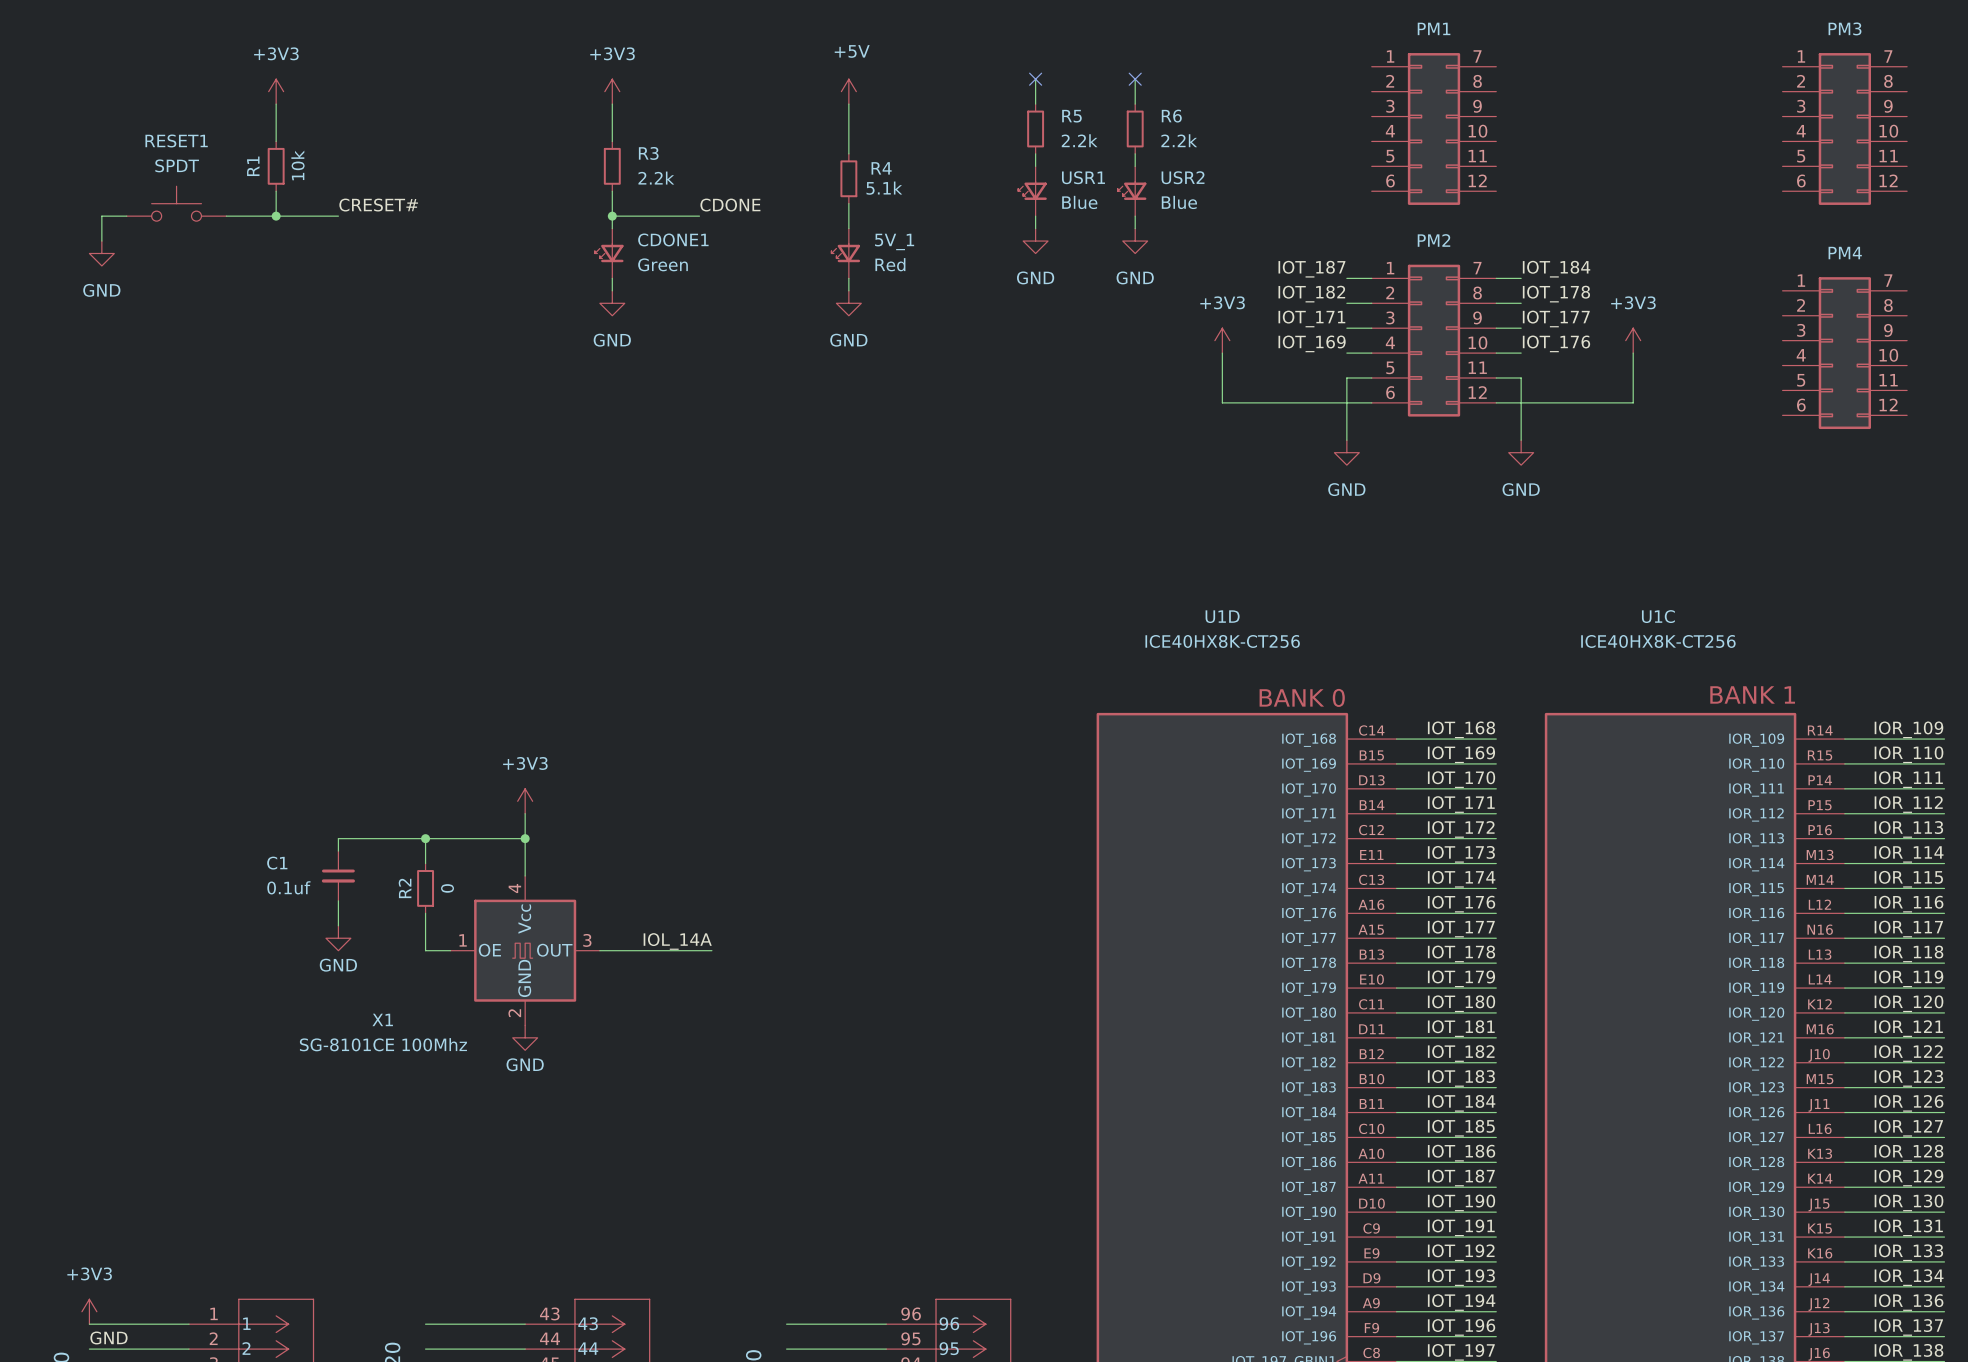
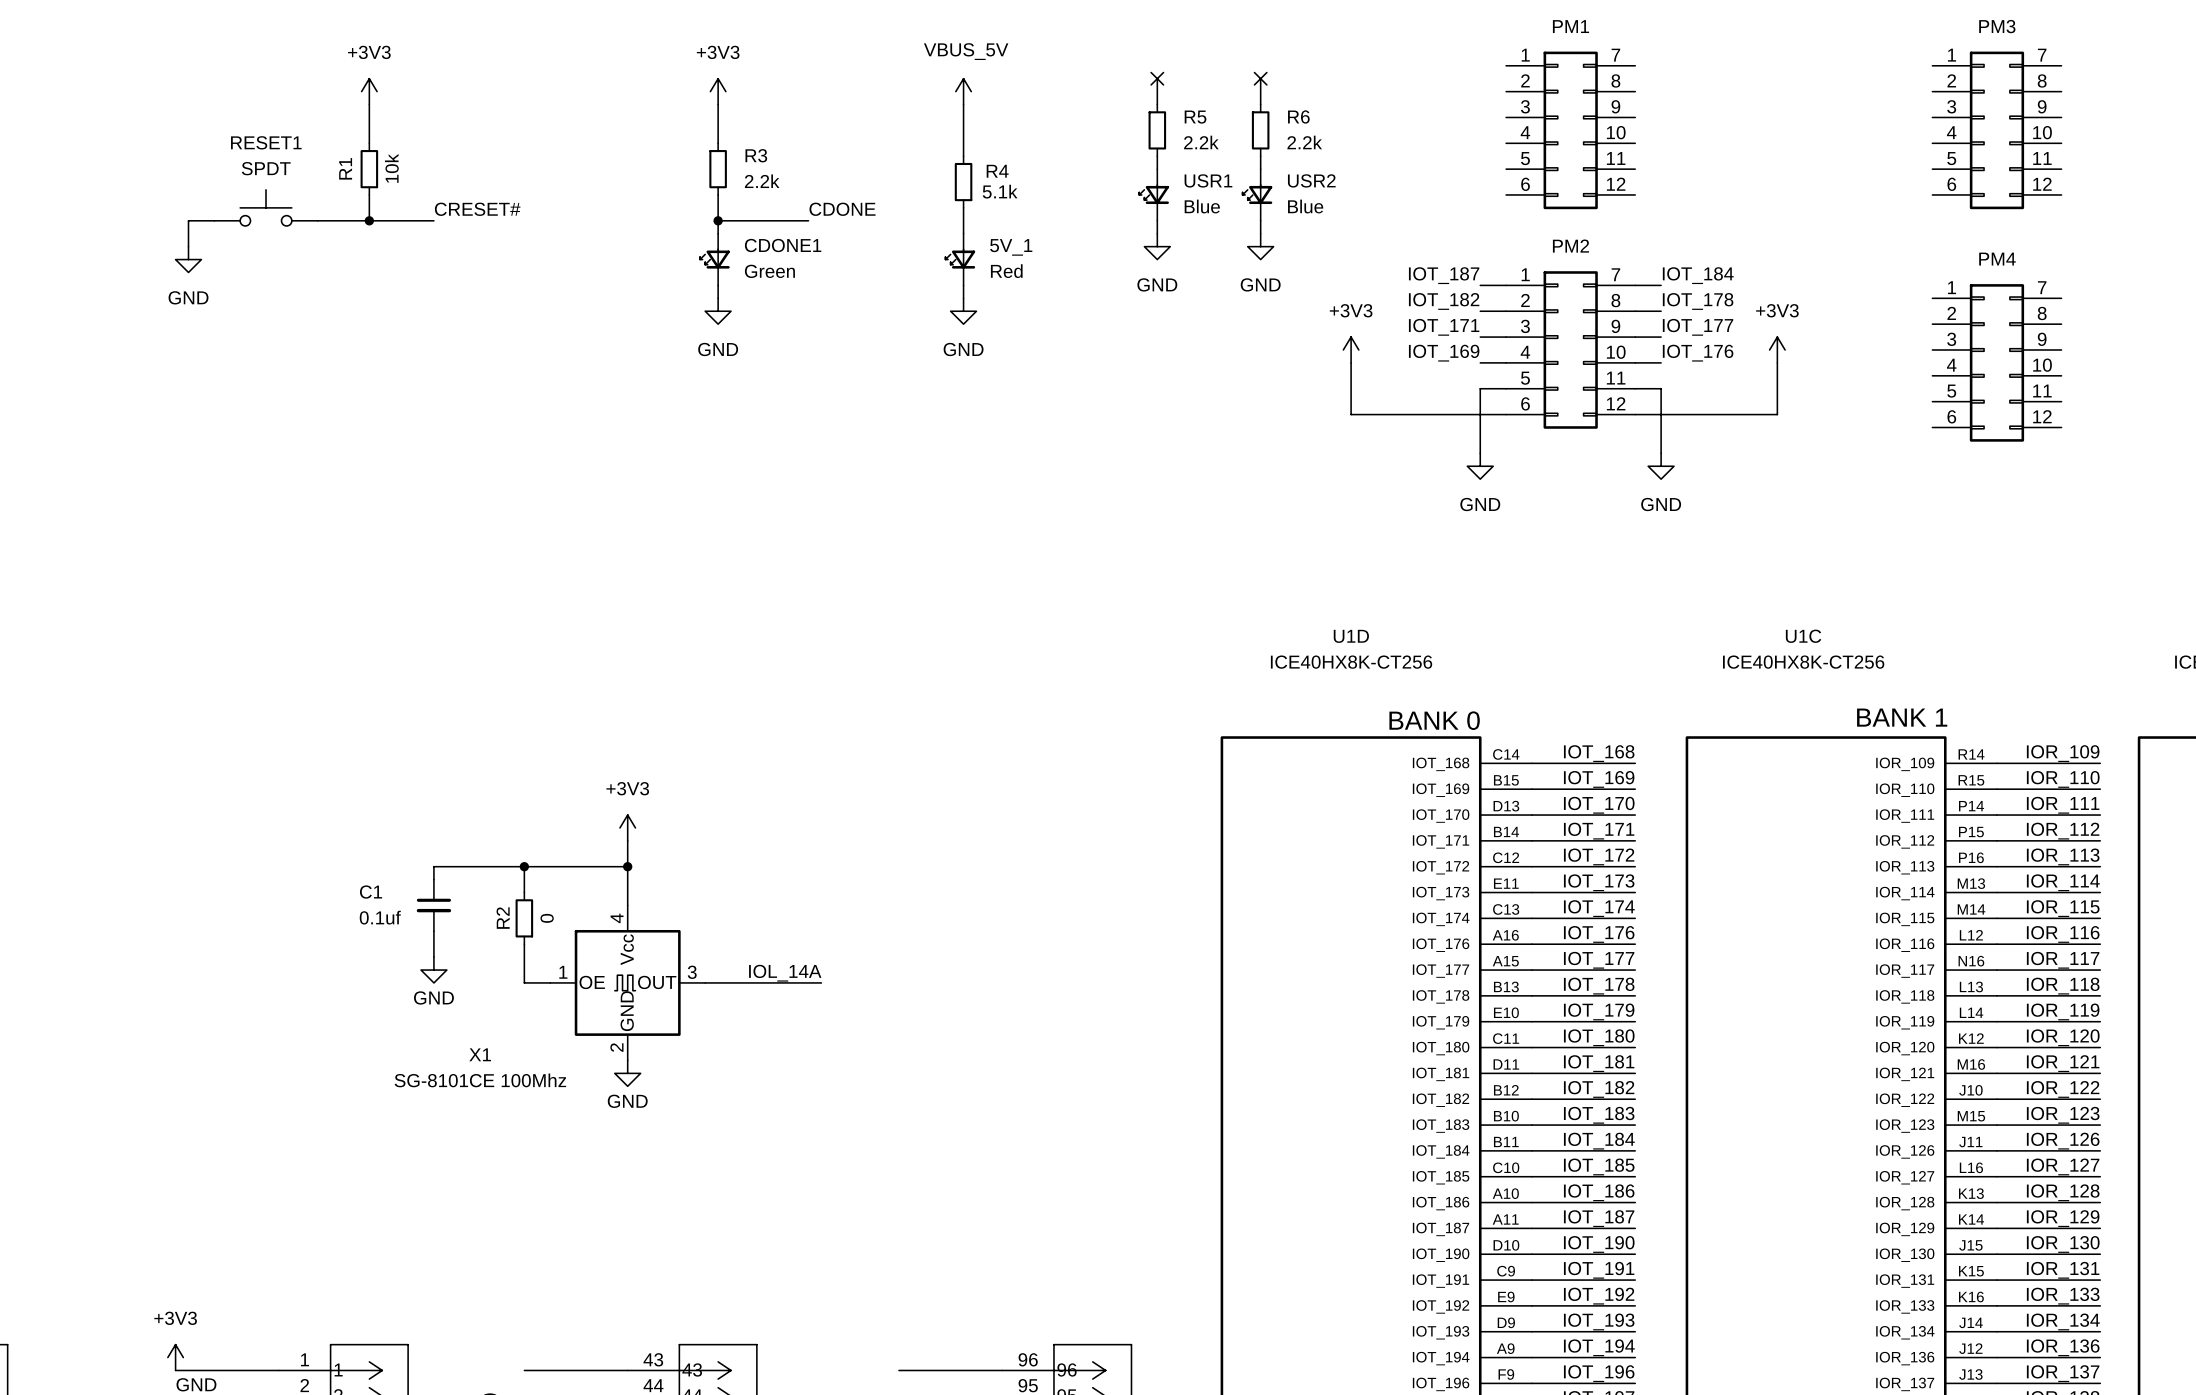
power symbol: +5V (848, 91) -> VBUS_5V (963, 91)

